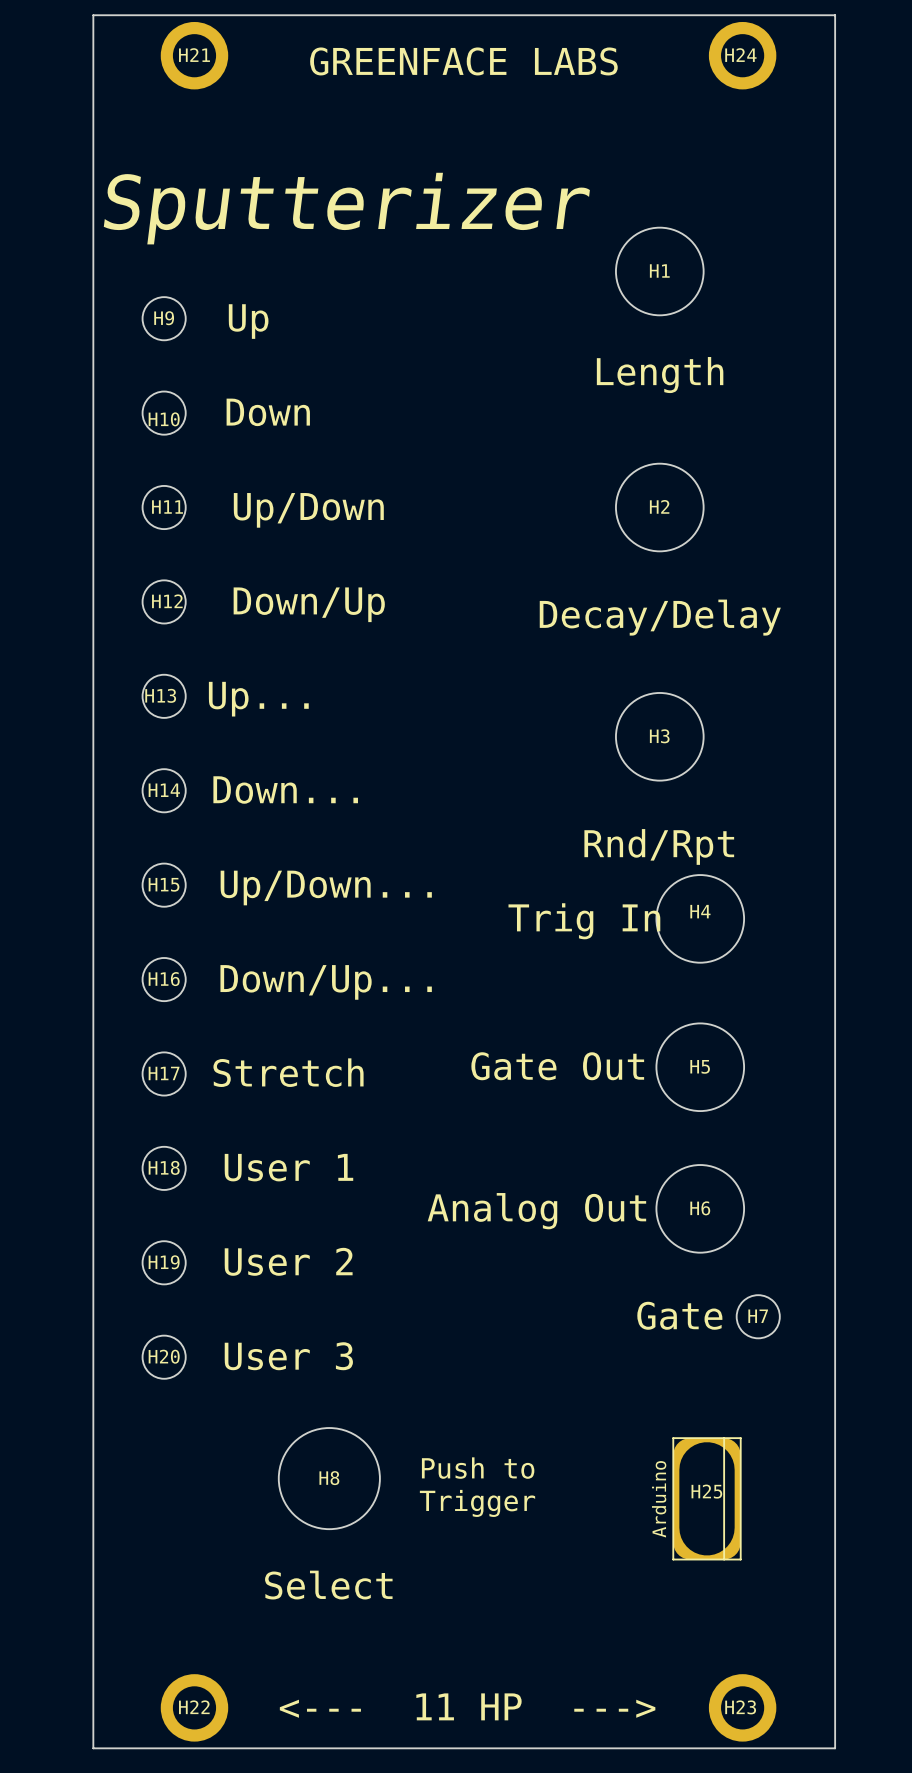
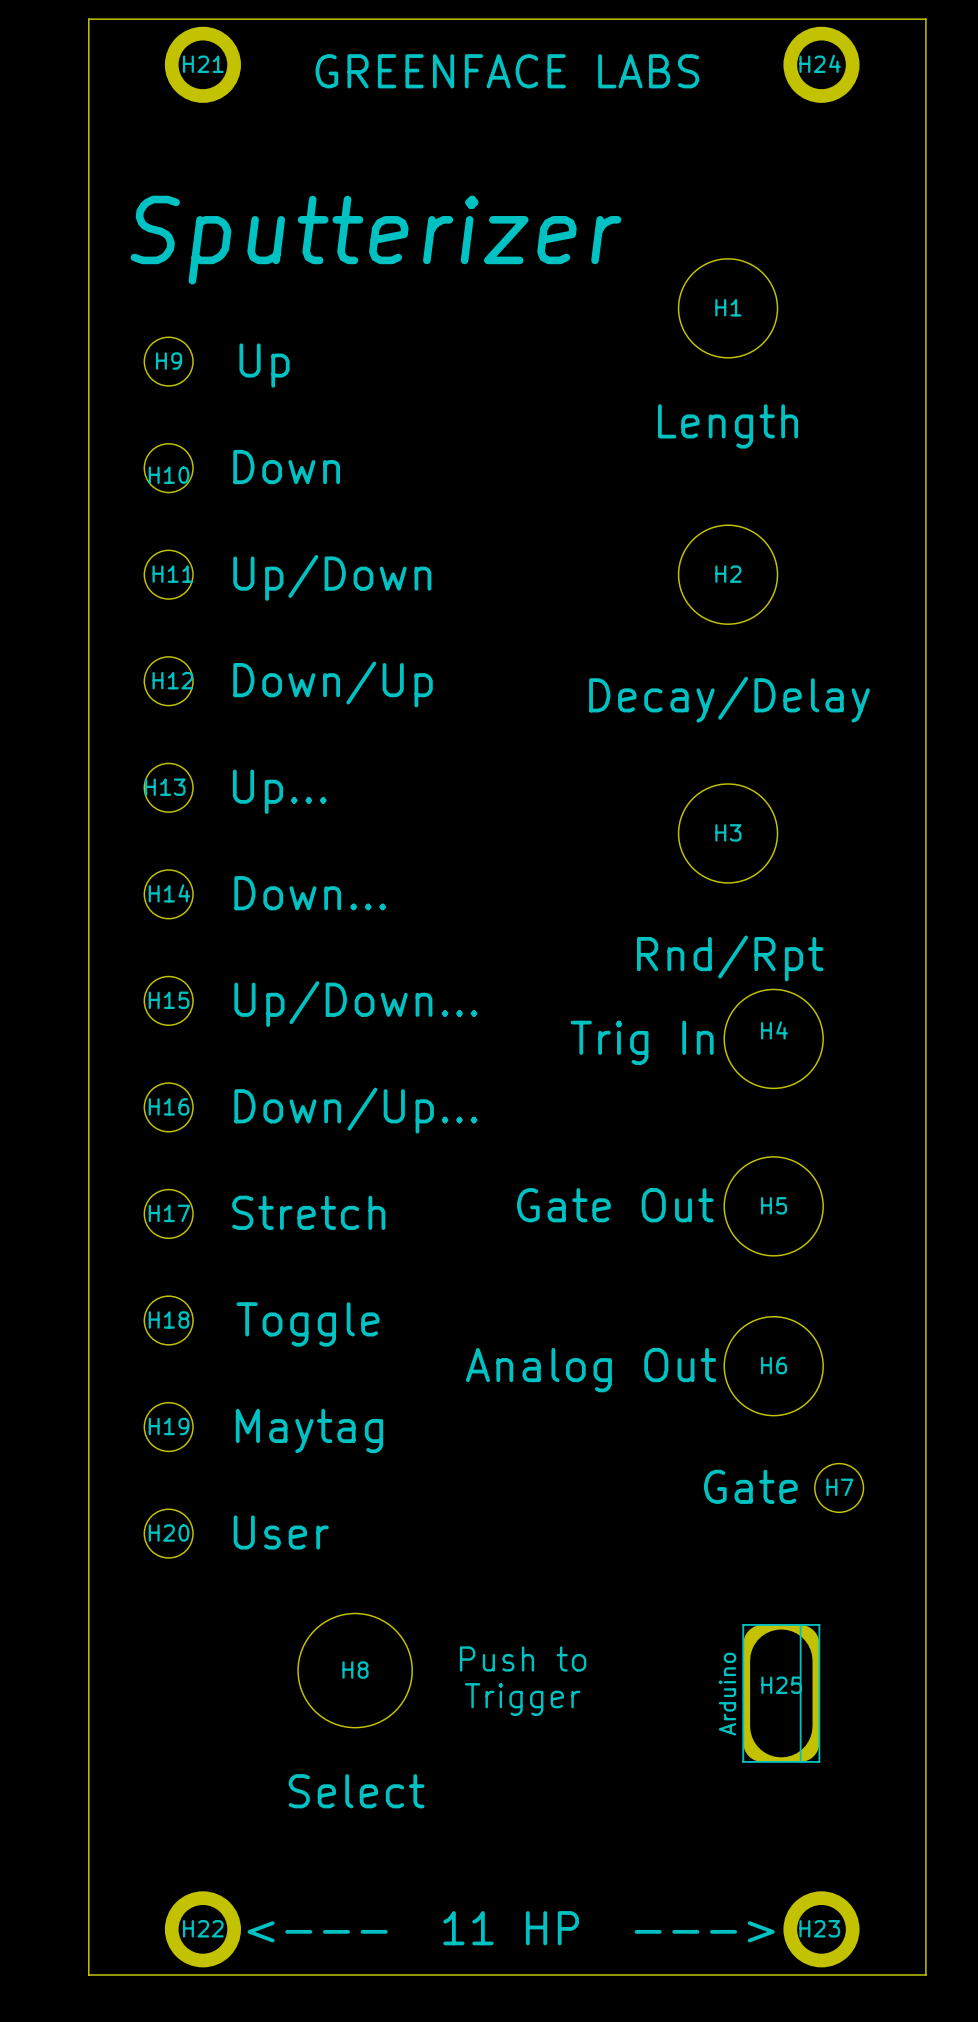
text: User 1 (288, 1167) -> Toggle (308, 1324)
text: User 2 (288, 1261) -> Maytag (309, 1431)
text: User 3 (288, 1356) -> User (281, 1532)

